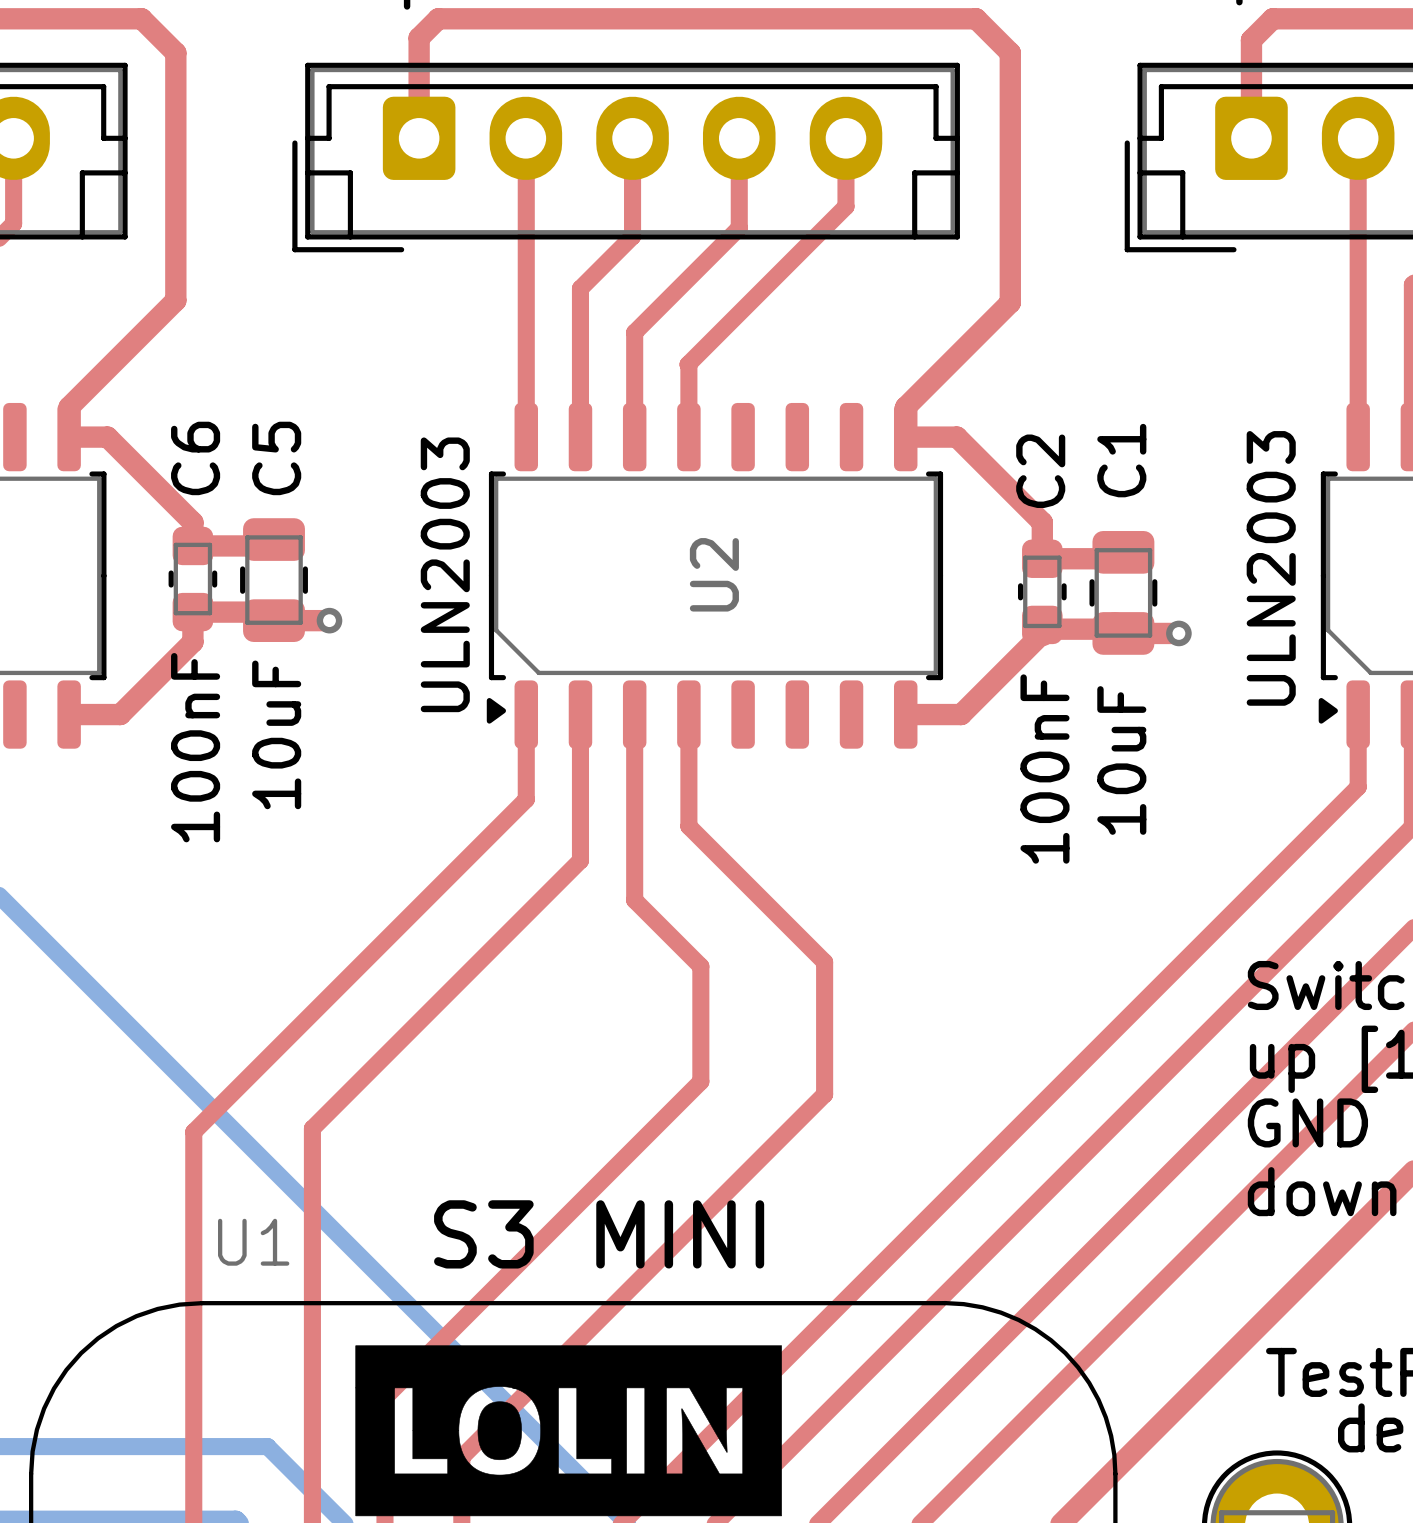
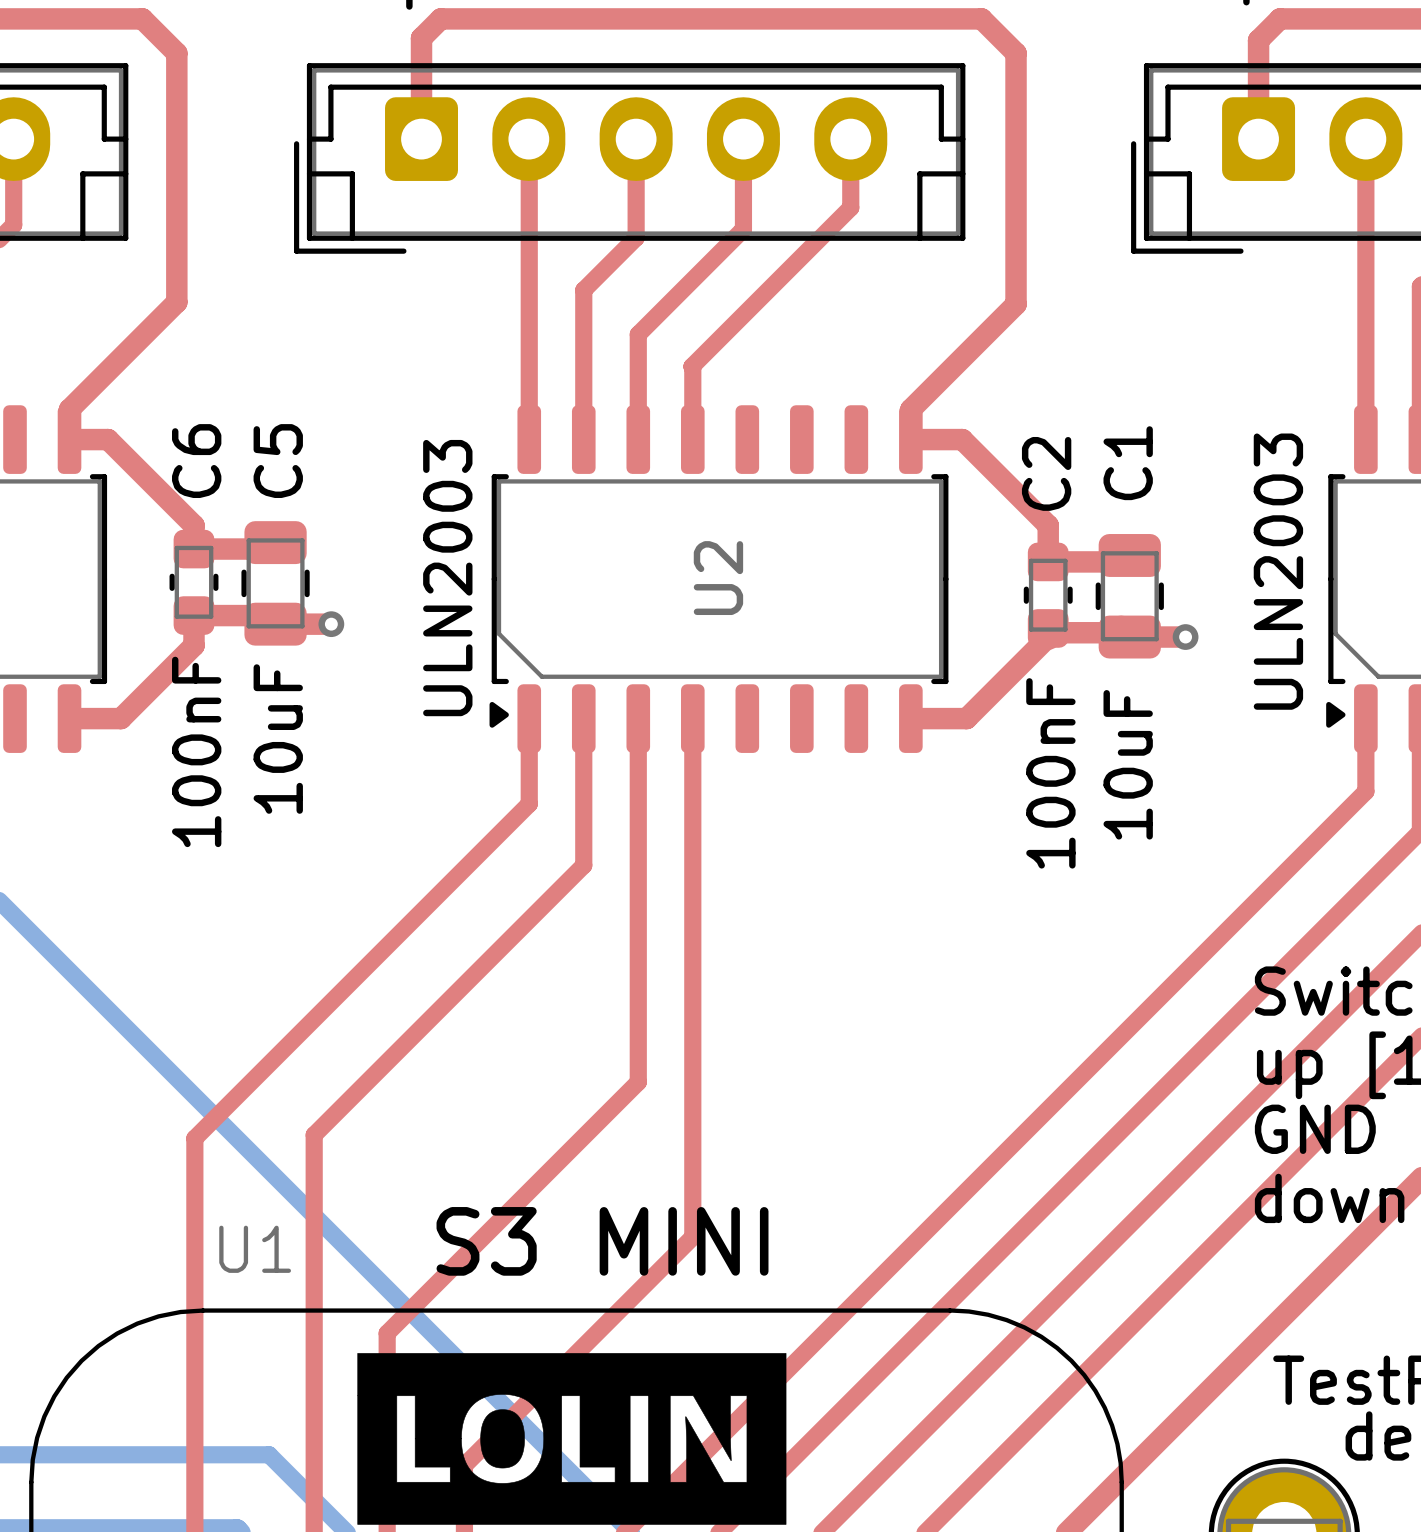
top track: (688, 826) (824, 962) (824, 1094) (688, 1230) -> (692, 831) (692, 1237)
top track: (634, 900) (700, 966) (700, 1081) (384, 1397) -> (638, 905) (638, 1082) (387, 1333) (387, 1405)

